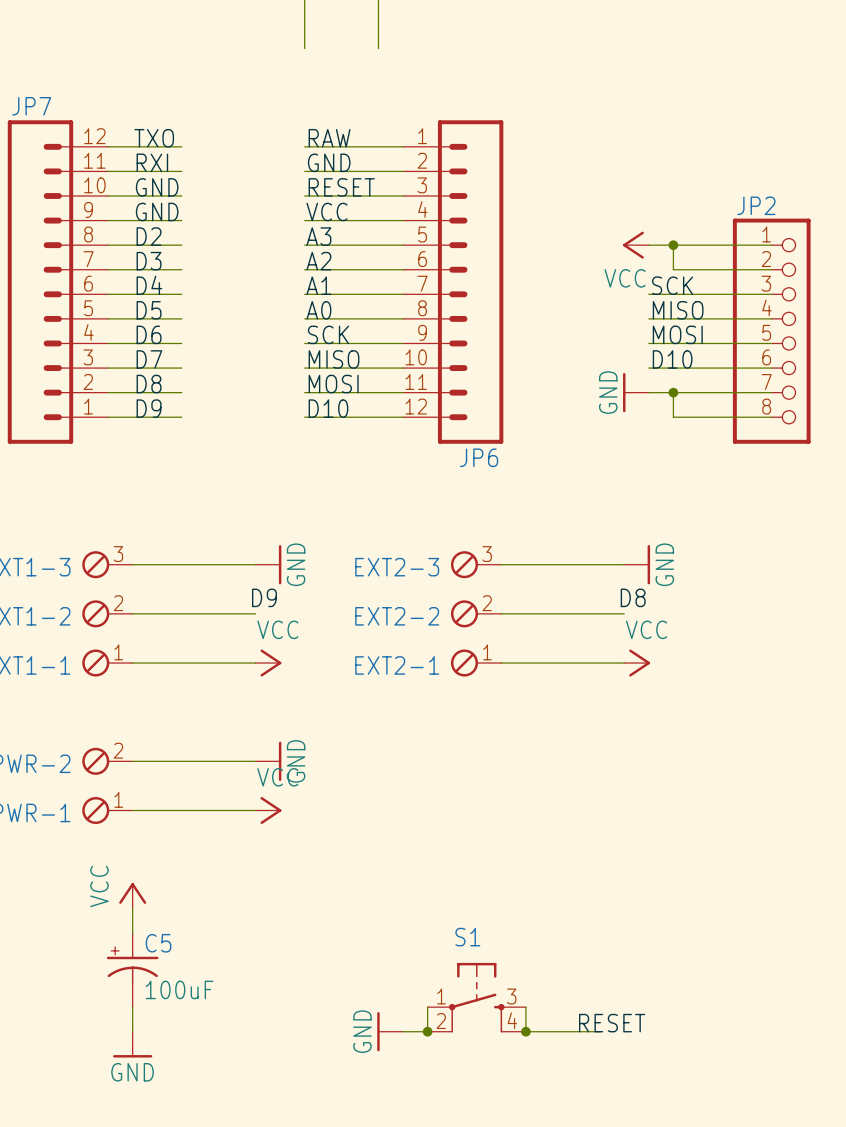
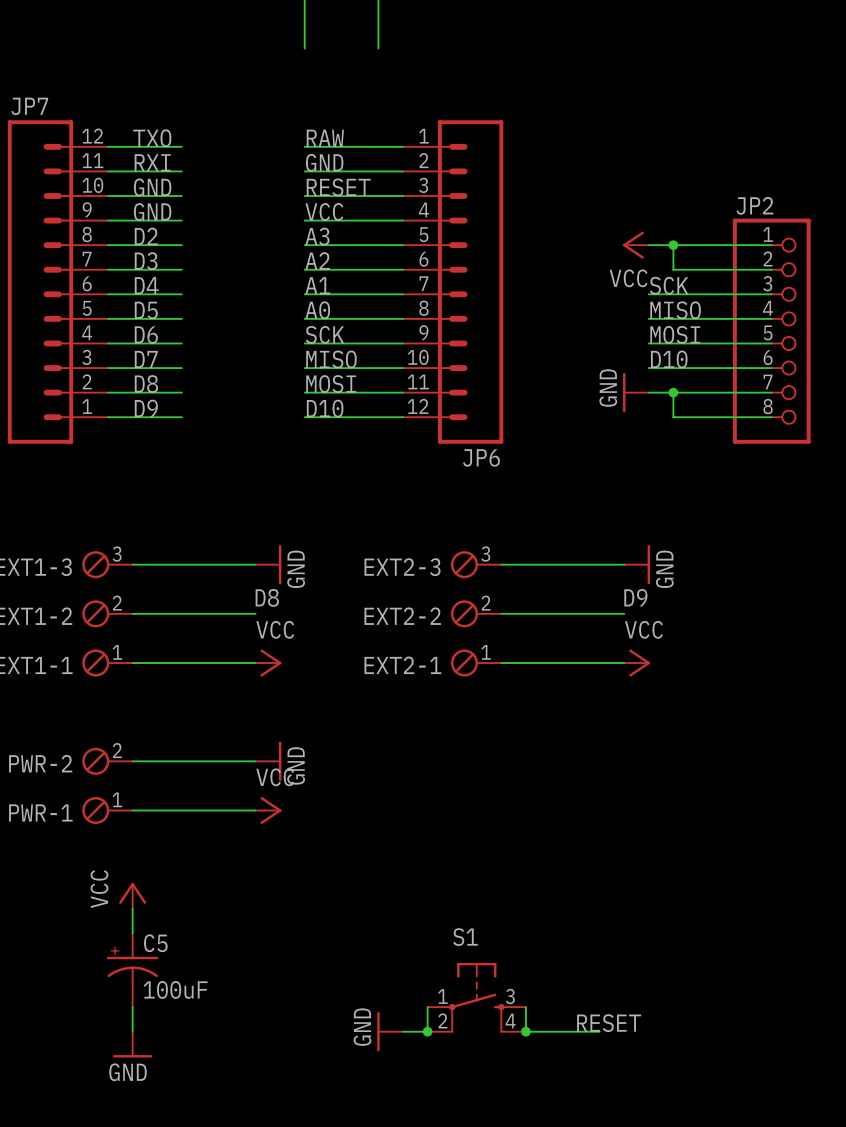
label: D9 (264, 597) -> D8 (267, 597)
label: D8 (633, 597) -> D9 (635, 597)

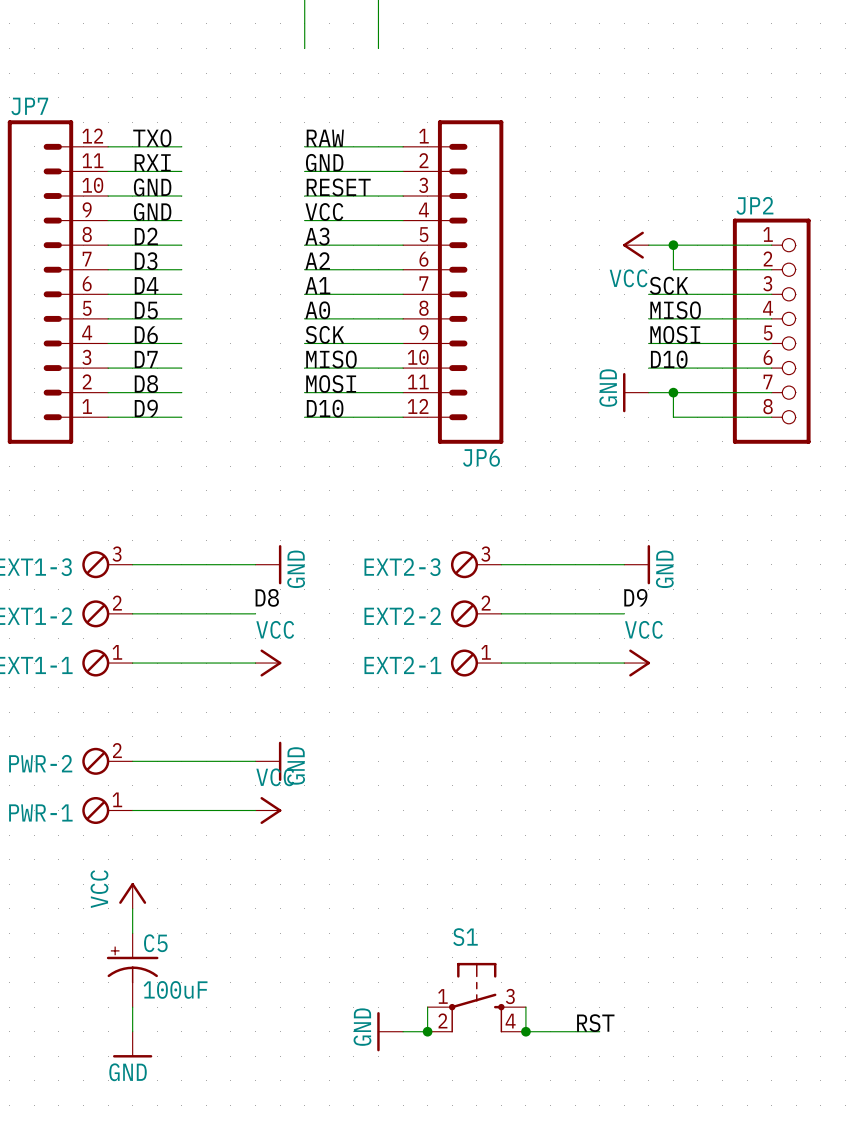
label: RESET (609, 1023) -> RST (595, 1023)

